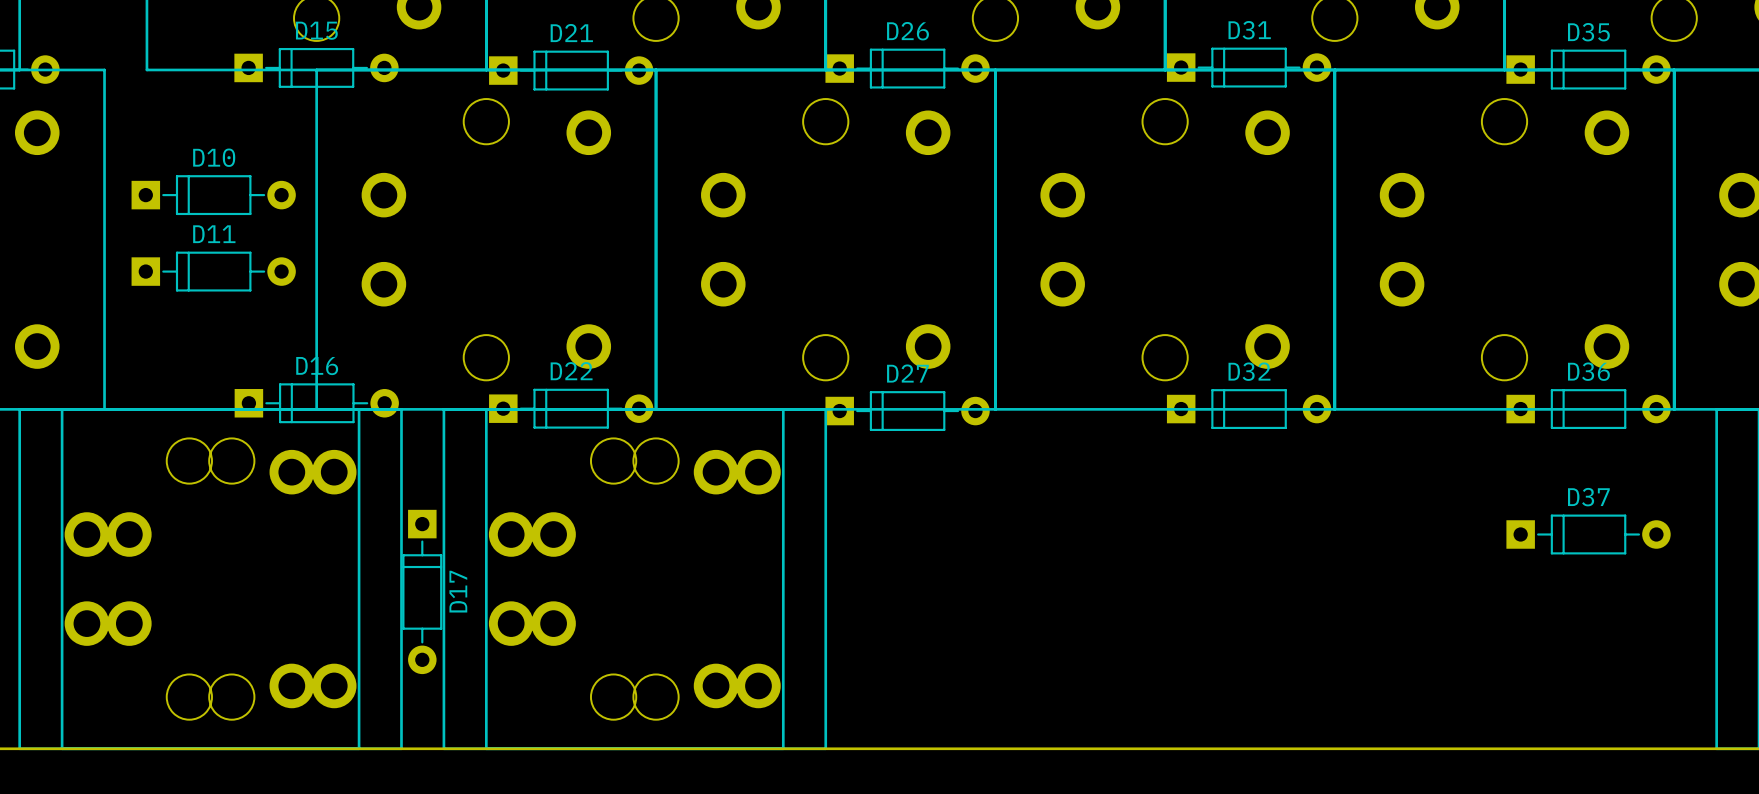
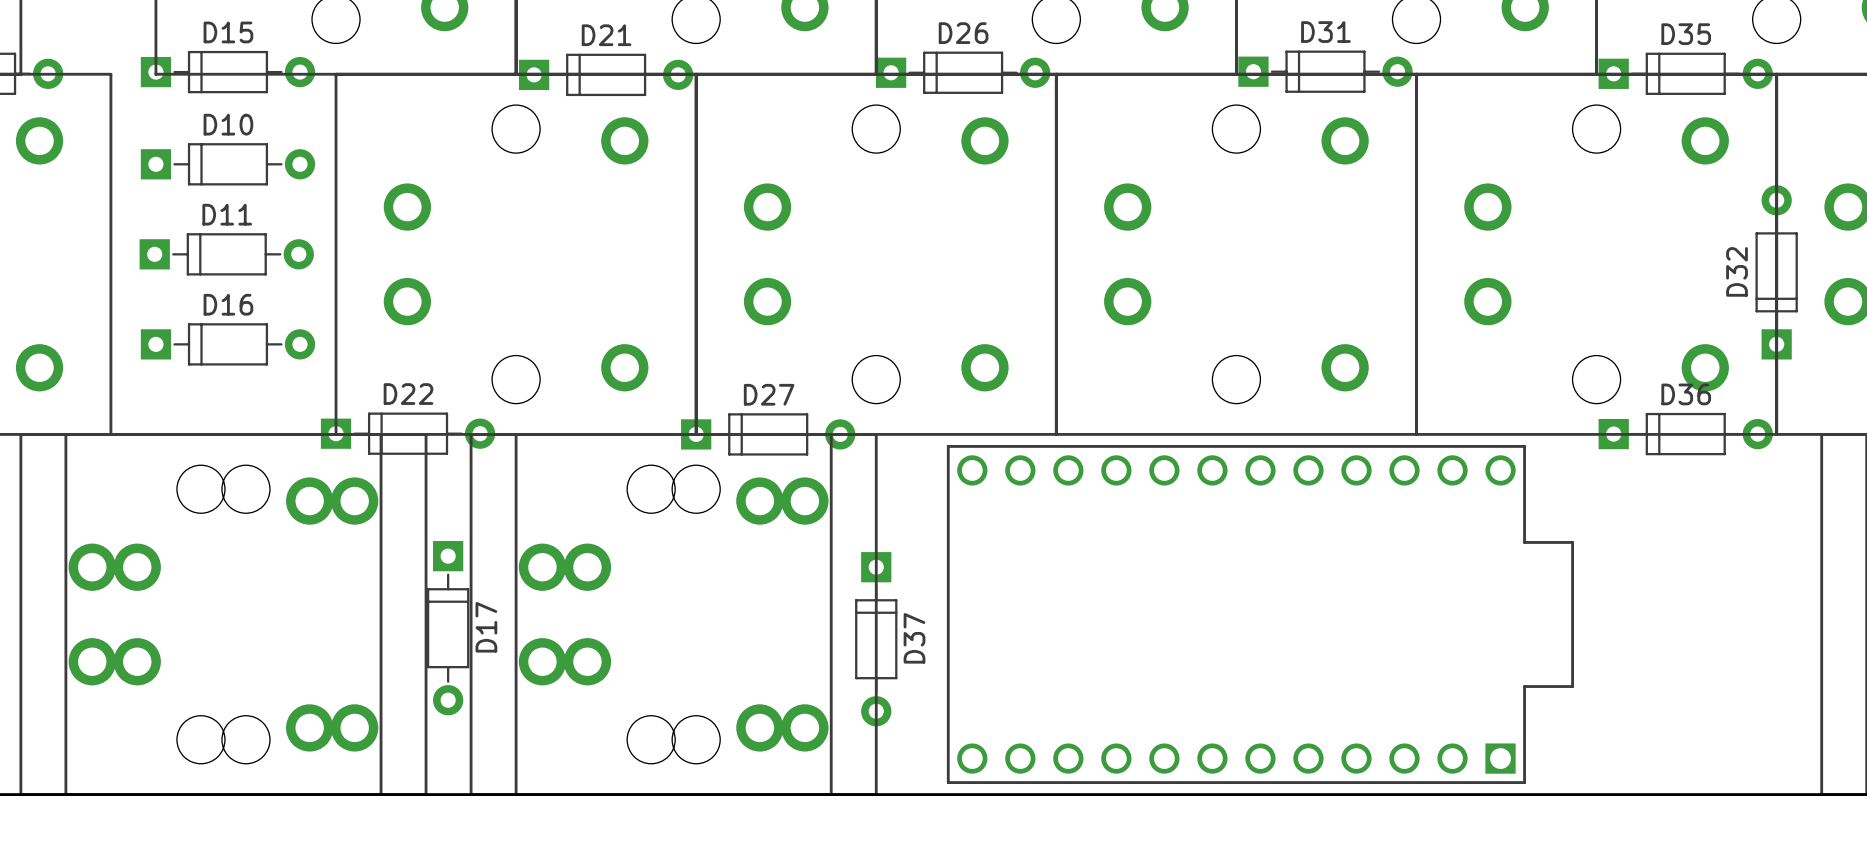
D15 position: (316, 67) -> (227, 72)
D10 position: (213, 195) -> (227, 164)
D11 position: (213, 271) -> (226, 254)
D16 position: (316, 403) -> (227, 344)
D22 position: (571, 408) -> (408, 433)
D32 rotation: 0° (1249, 409) -> 90° counterclockwise (1776, 272)
D32 position: (1249, 409) -> (1776, 272)
D27 position: (907, 411) -> (768, 434)
D37 rotation: 0° (1588, 534) -> 90° clockwise (876, 639)
D37 position: (1588, 534) -> (876, 639)
part: none -> (1260, 614)

